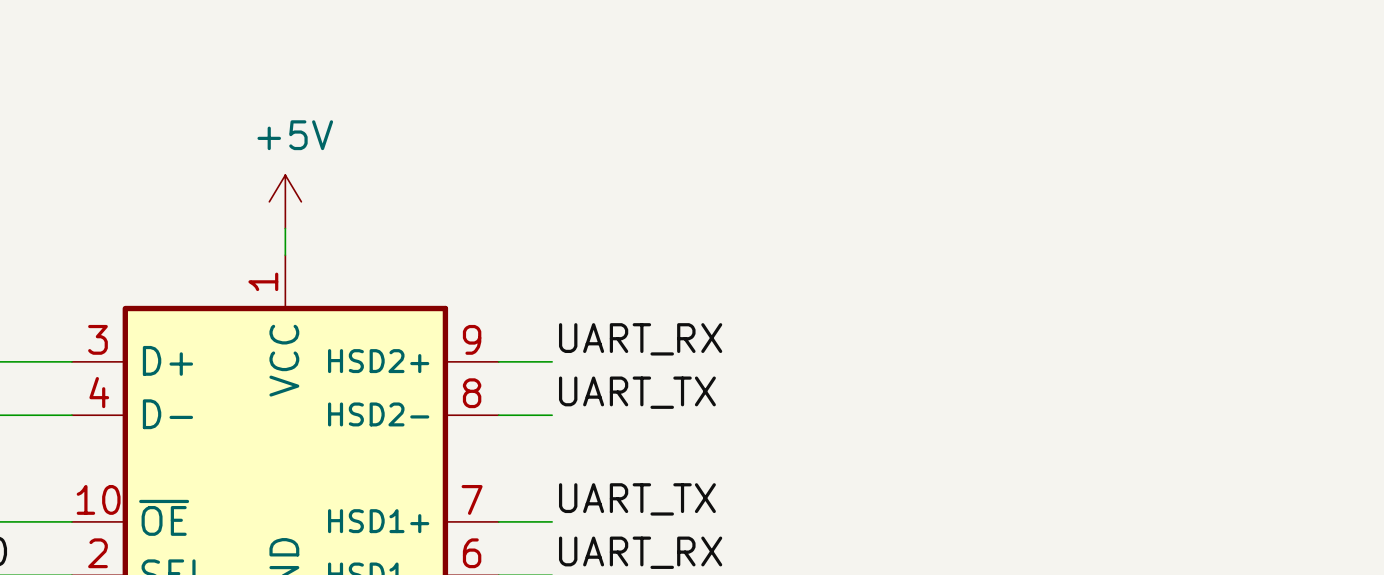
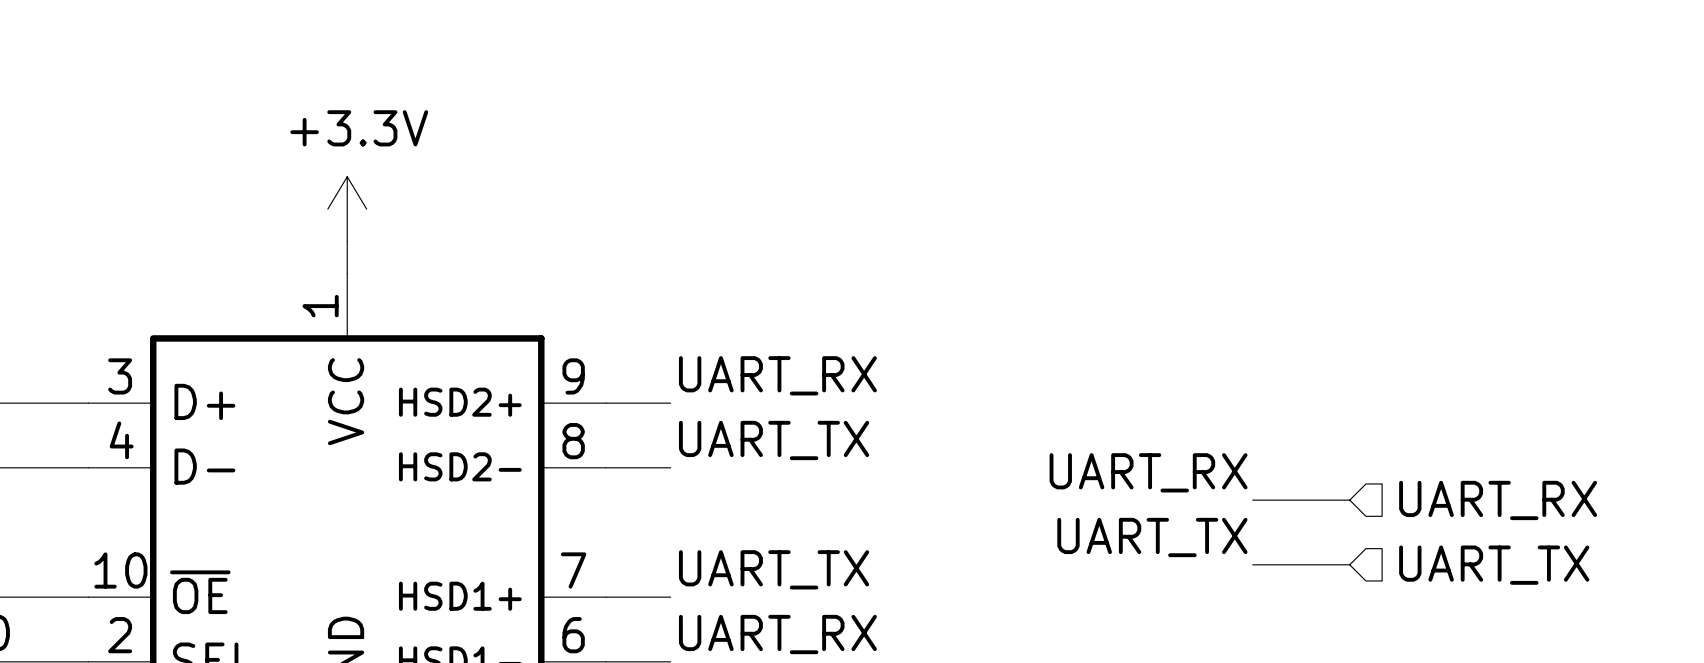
power symbol: +5V (285, 201) -> +3.3V (347, 209)
label: none -> UART_RX (1148, 472)
wire: none -> (1252, 500) (1349, 500)
hierarchical label: none -> UART_RX (1498, 500)
label: none -> UART_TX (1152, 537)
wire: none -> (1252, 564) (1349, 564)
hierarchical label: none -> UART_TX (1494, 565)

